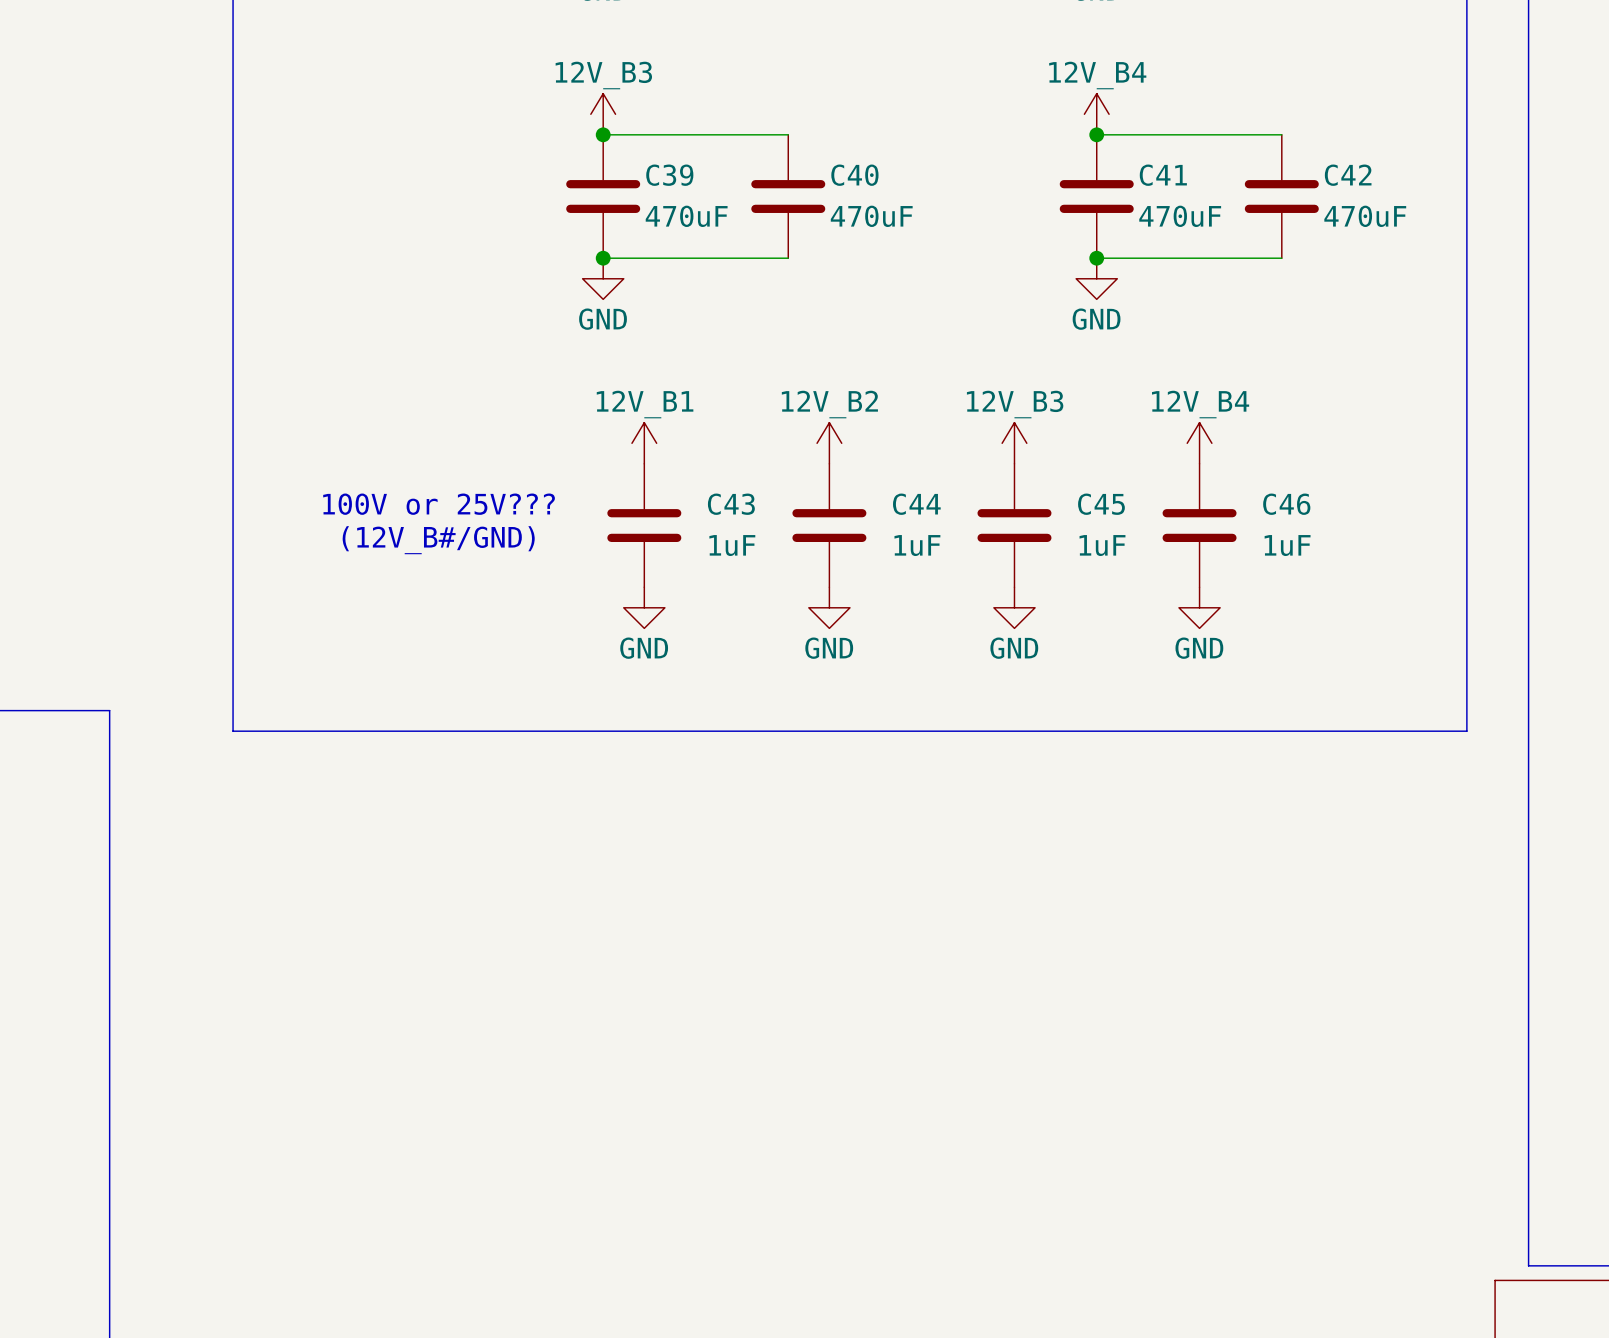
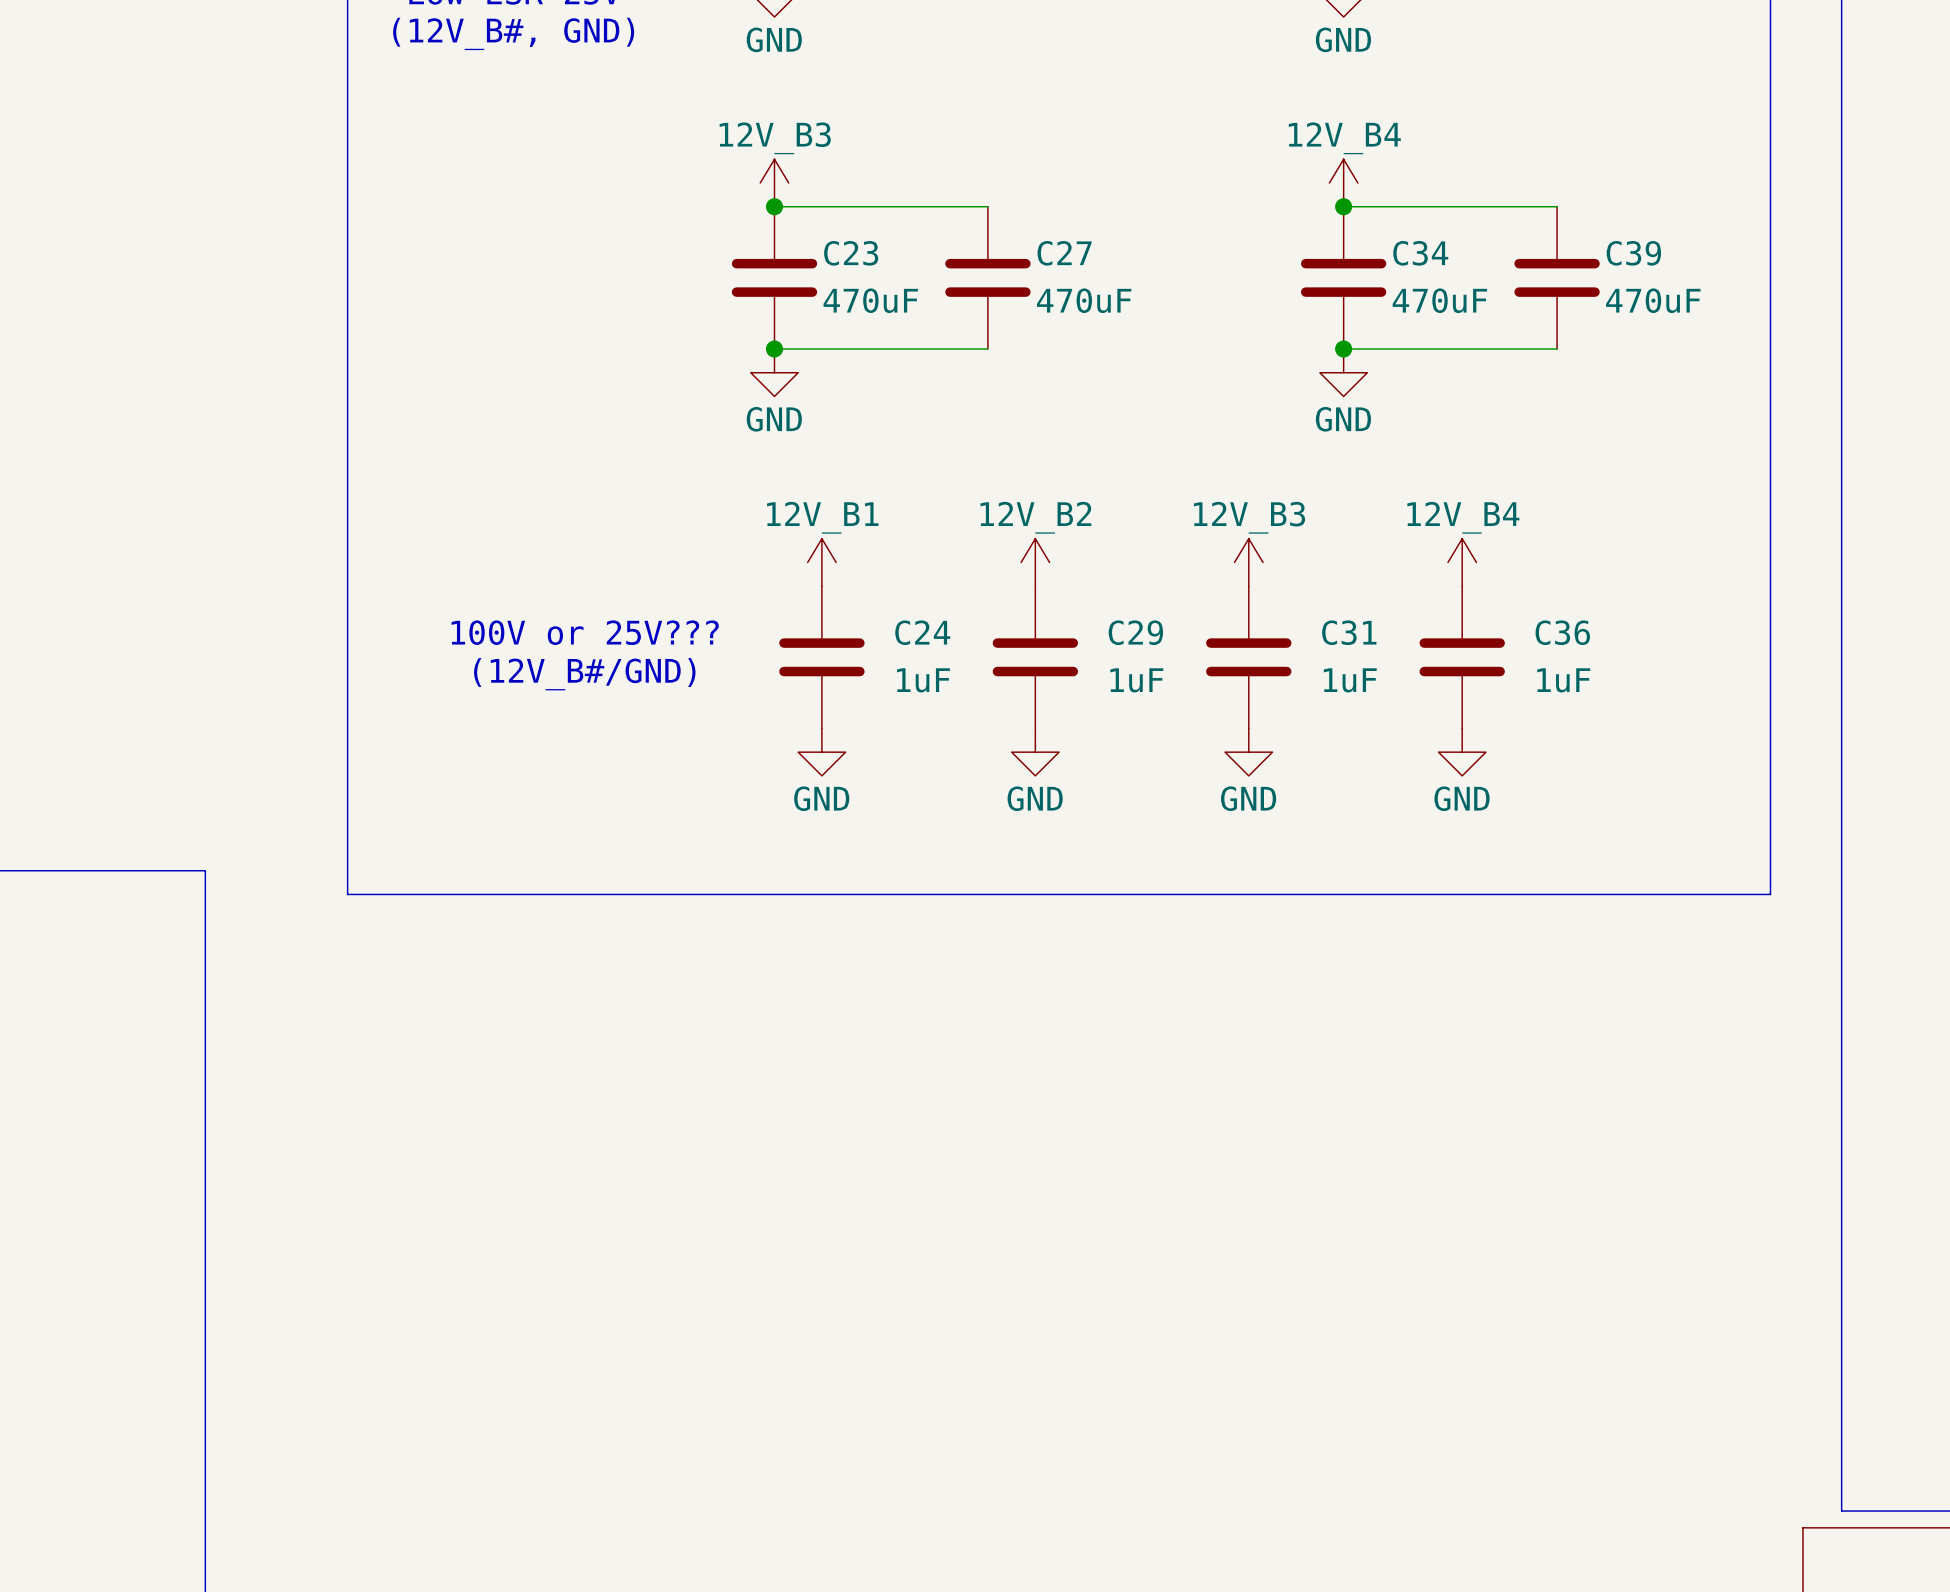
C39 name: C39 (669, 175) -> C23 (851, 253)
C40 name: C40 (854, 175) -> C27 (1064, 253)
C41 name: C41 (1163, 175) -> C34 (1420, 253)
C42 name: C42 (1348, 175) -> C39 (1633, 253)
C43 name: C43 (731, 504) -> C24 (922, 632)
C44 name: C44 (916, 504) -> C29 (1135, 632)
C45 name: C45 (1101, 504) -> C31 (1349, 632)
C46 name: C46 (1286, 504) -> C36 (1562, 632)

